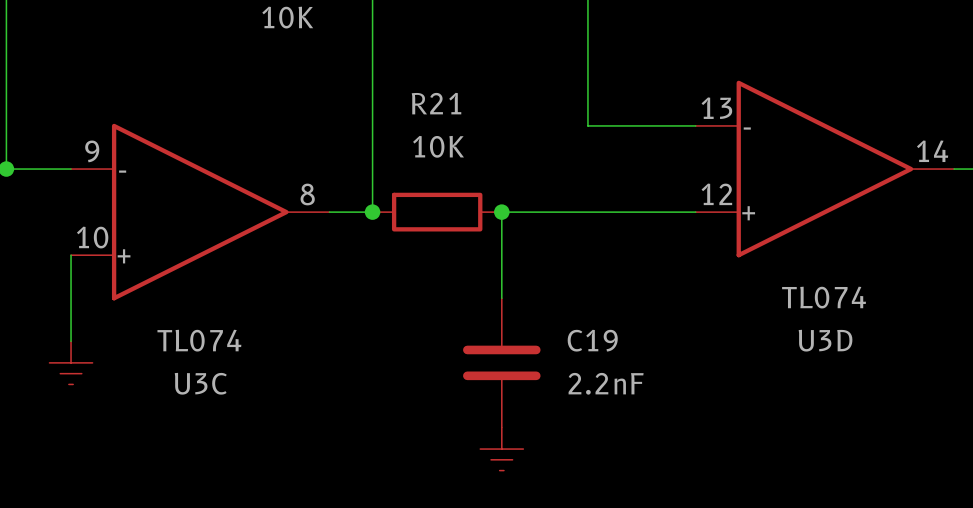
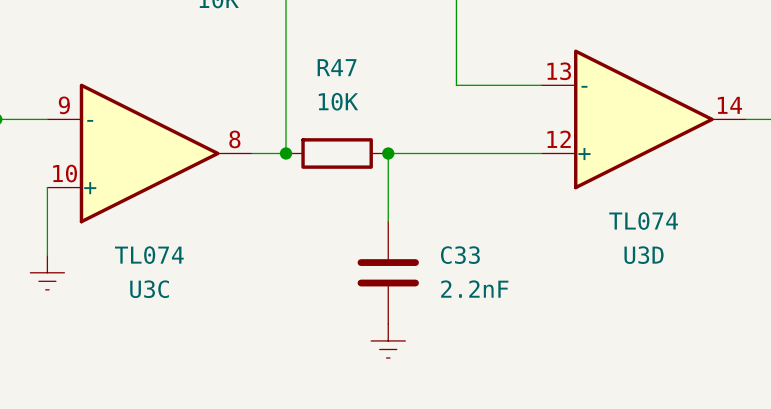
R21 name: R21 (436, 103) -> R47 (337, 67)
C19 name: C19 (592, 340) -> C33 (460, 255)

